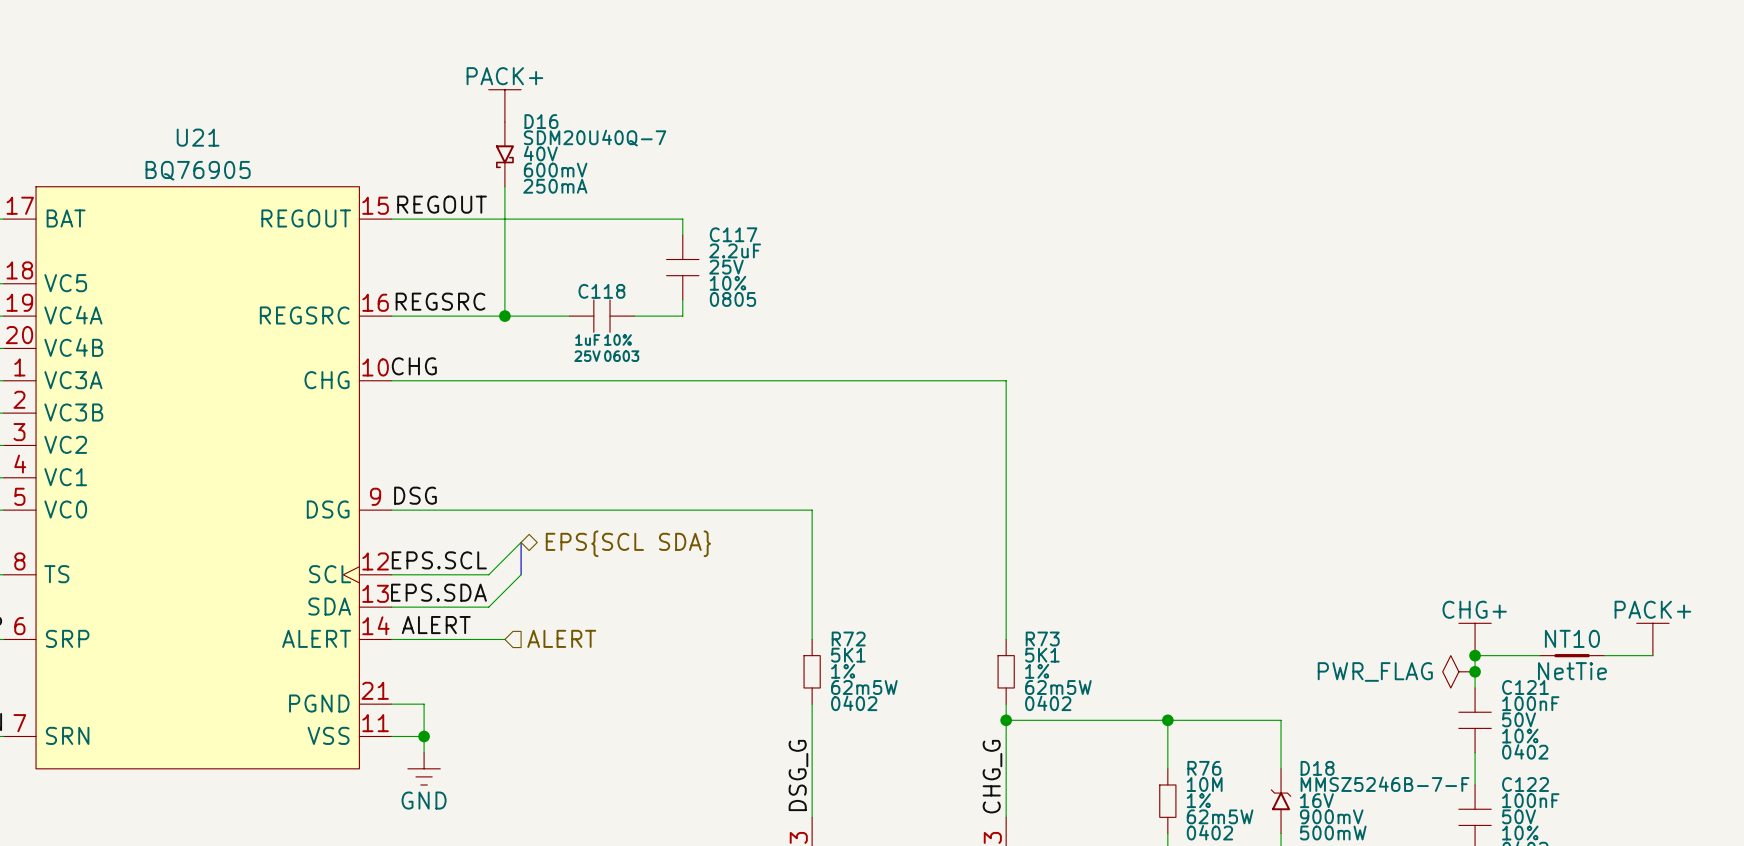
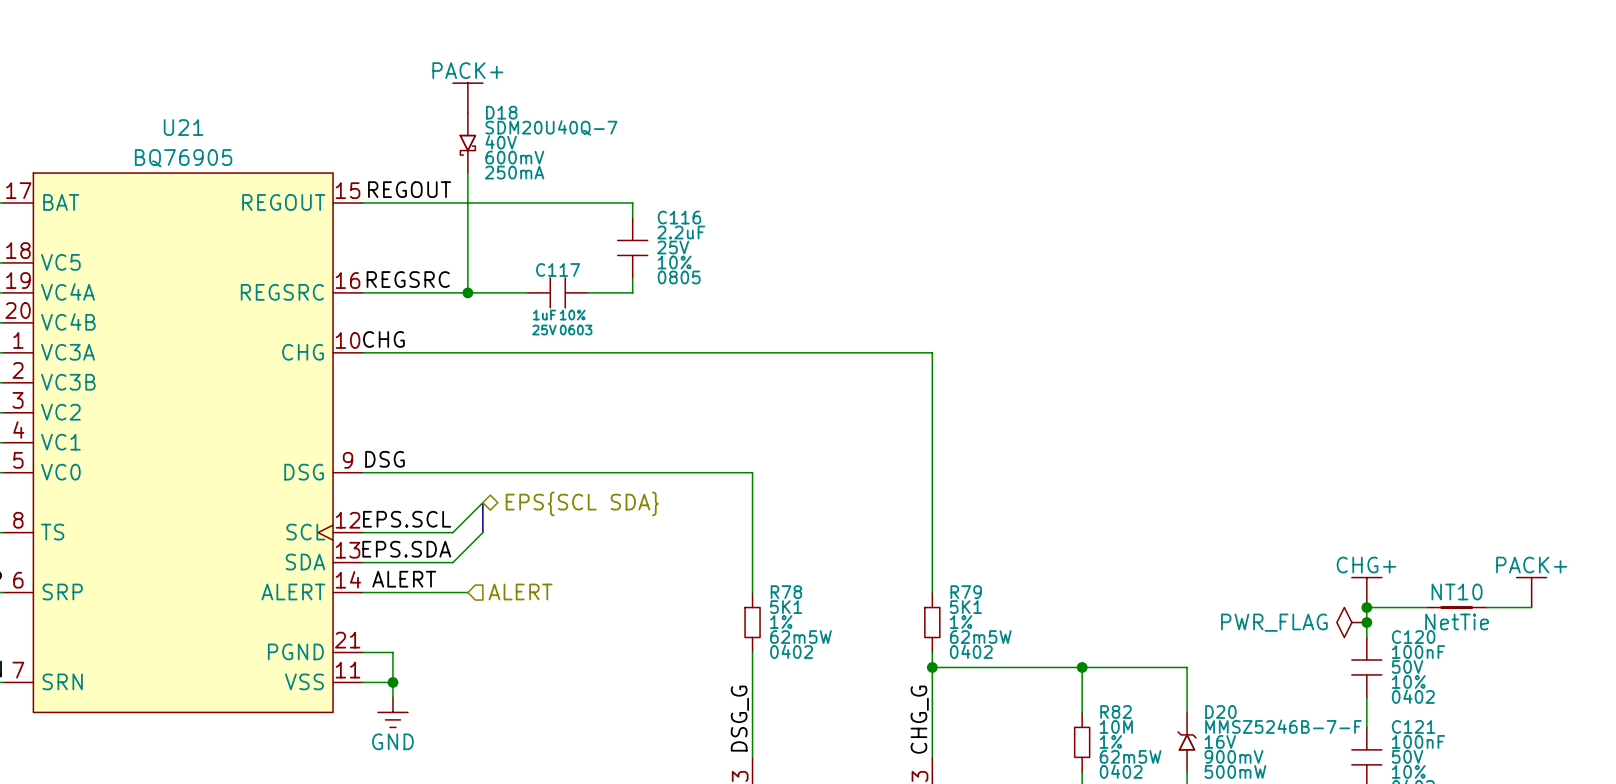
D16 name: D16 (541, 121) -> D18 (501, 112)
C117 name: C117 (733, 234) -> C116 (679, 217)
C118 name: C118 (601, 291) -> C117 (558, 269)
R72 name: R72 (848, 638) -> R78 (786, 592)
R73 name: R73 (1042, 638) -> R79 (966, 592)
C121 name: C121 (1525, 687) -> C120 (1413, 637)
R76 name: R76 (1204, 768) -> R82 (1116, 711)
D18 name: D18 (1317, 768) -> D20 (1220, 711)
C122 name: C122 (1525, 784) -> C121 (1413, 726)

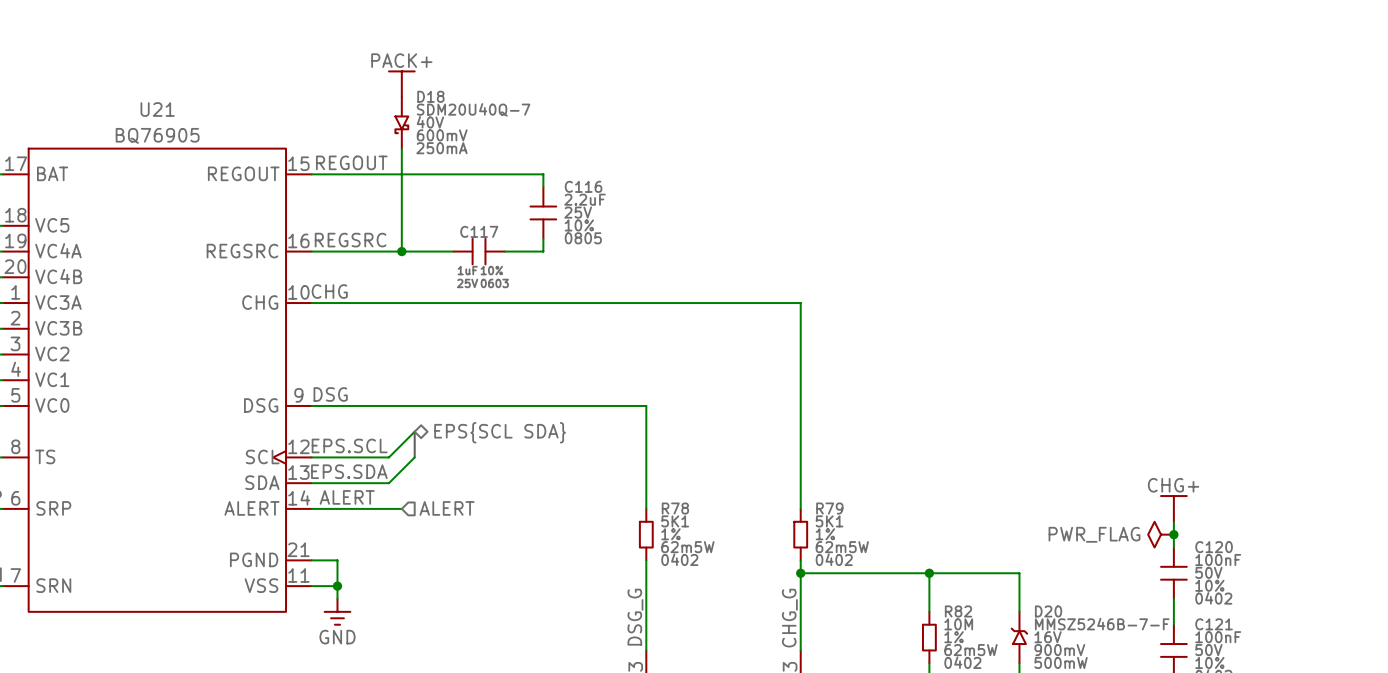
power symbol: PACK+ (1531, 592) -> none
wire: (1366, 607) (1426, 607) -> none
junction: (1366, 607) -> none
NT10: NetTie (1456, 607) -> none
wire: (1486, 607) (1531, 607) -> none

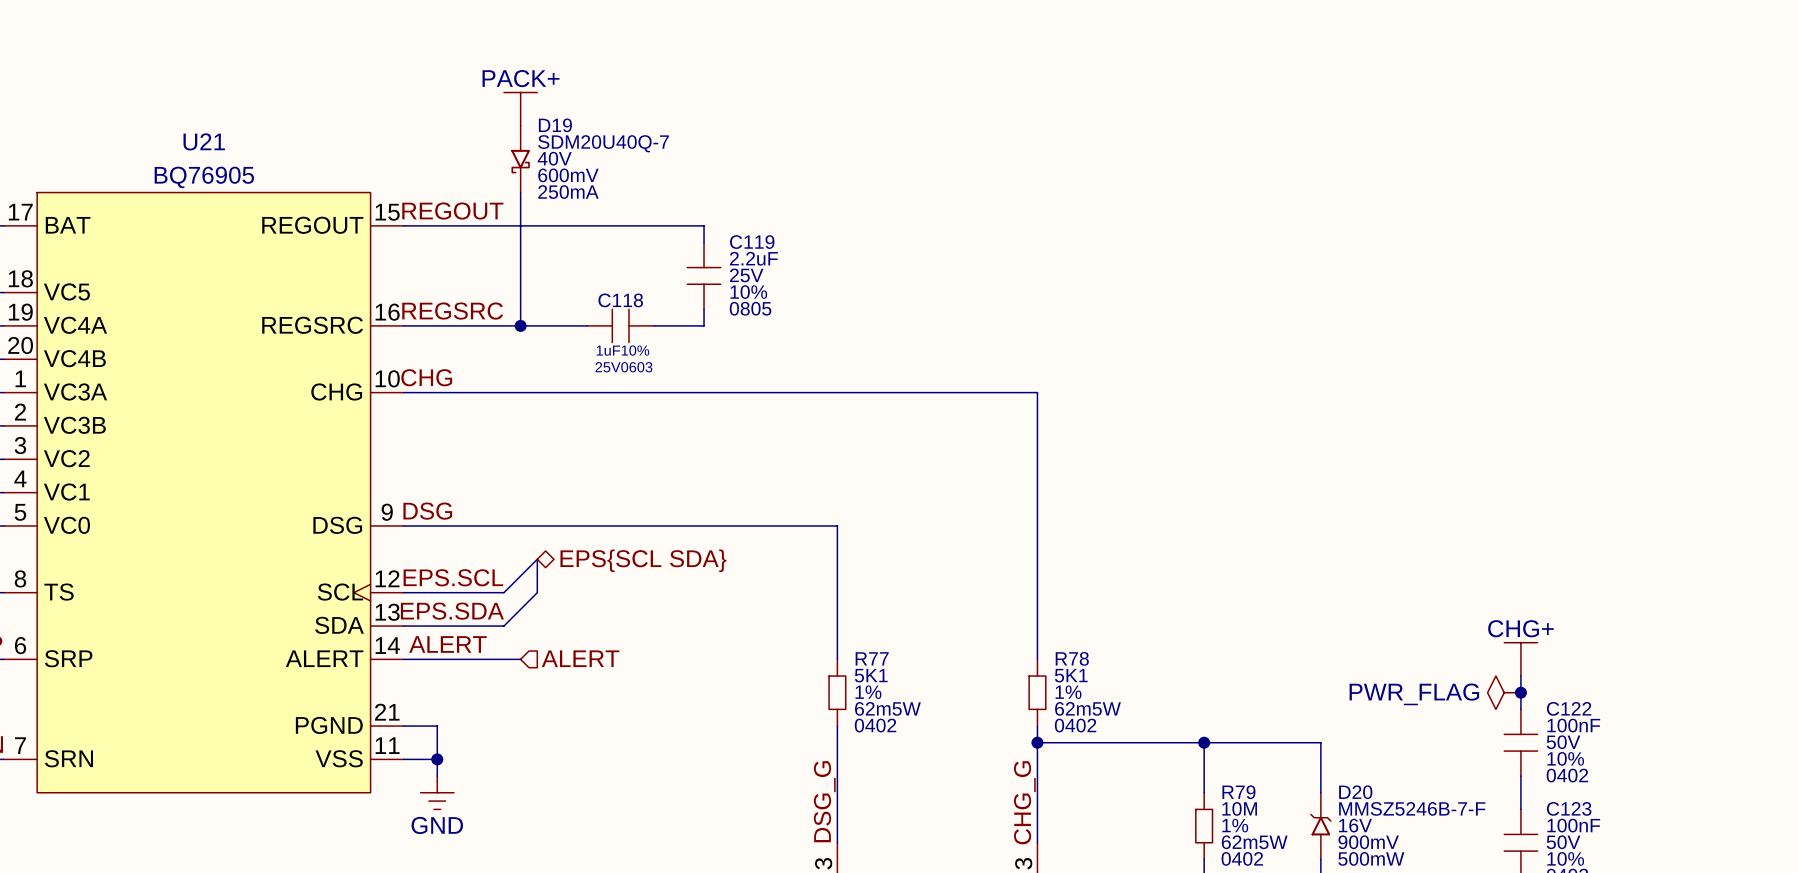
D18 name: D18 (430, 96) -> D19 (555, 125)
C116 name: C116 (583, 186) -> C119 (752, 242)
C117 name: C117 (479, 231) -> C118 (620, 300)
R78 name: R78 (675, 508) -> R77 (872, 658)
R79 name: R79 (829, 508) -> R78 (1072, 658)
C120 name: C120 (1214, 547) -> C122 (1569, 708)
R82 name: R82 (958, 611) -> R79 (1238, 792)
C121 name: C121 (1214, 624) -> C123 (1569, 808)

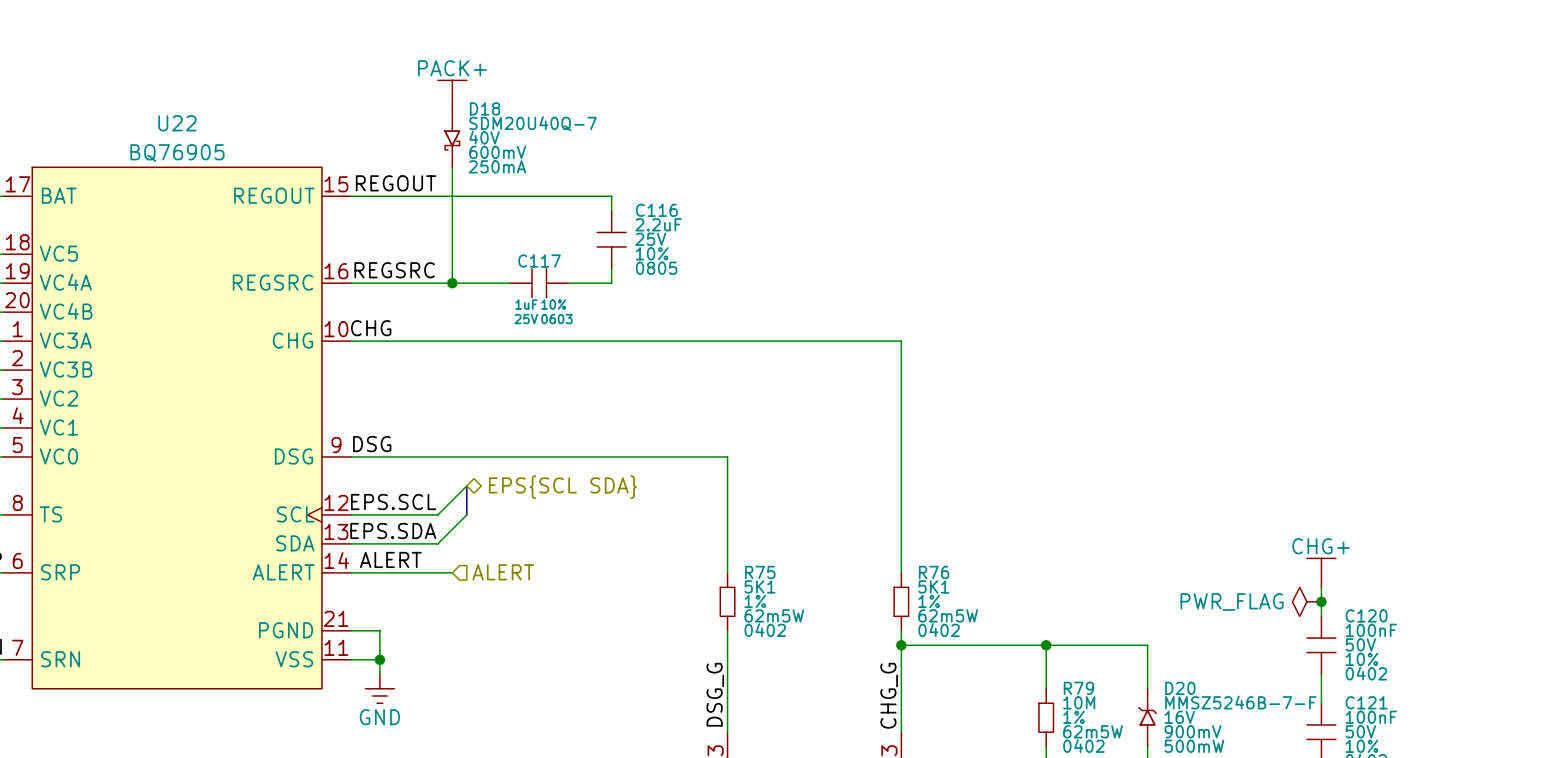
D19 name: D19 (555, 125) -> D18 (485, 108)
U21 name: U21 (204, 141) -> U22 (177, 123)
C119 name: C119 (752, 242) -> C116 (656, 210)
C118 name: C118 (620, 300) -> C117 (539, 261)
R77 name: R77 (872, 658) -> R75 (760, 572)
R78 name: R78 (1072, 658) -> R76 (934, 572)
C122 name: C122 (1569, 708) -> C120 (1366, 615)
C123 name: C123 (1569, 808) -> C121 (1366, 702)

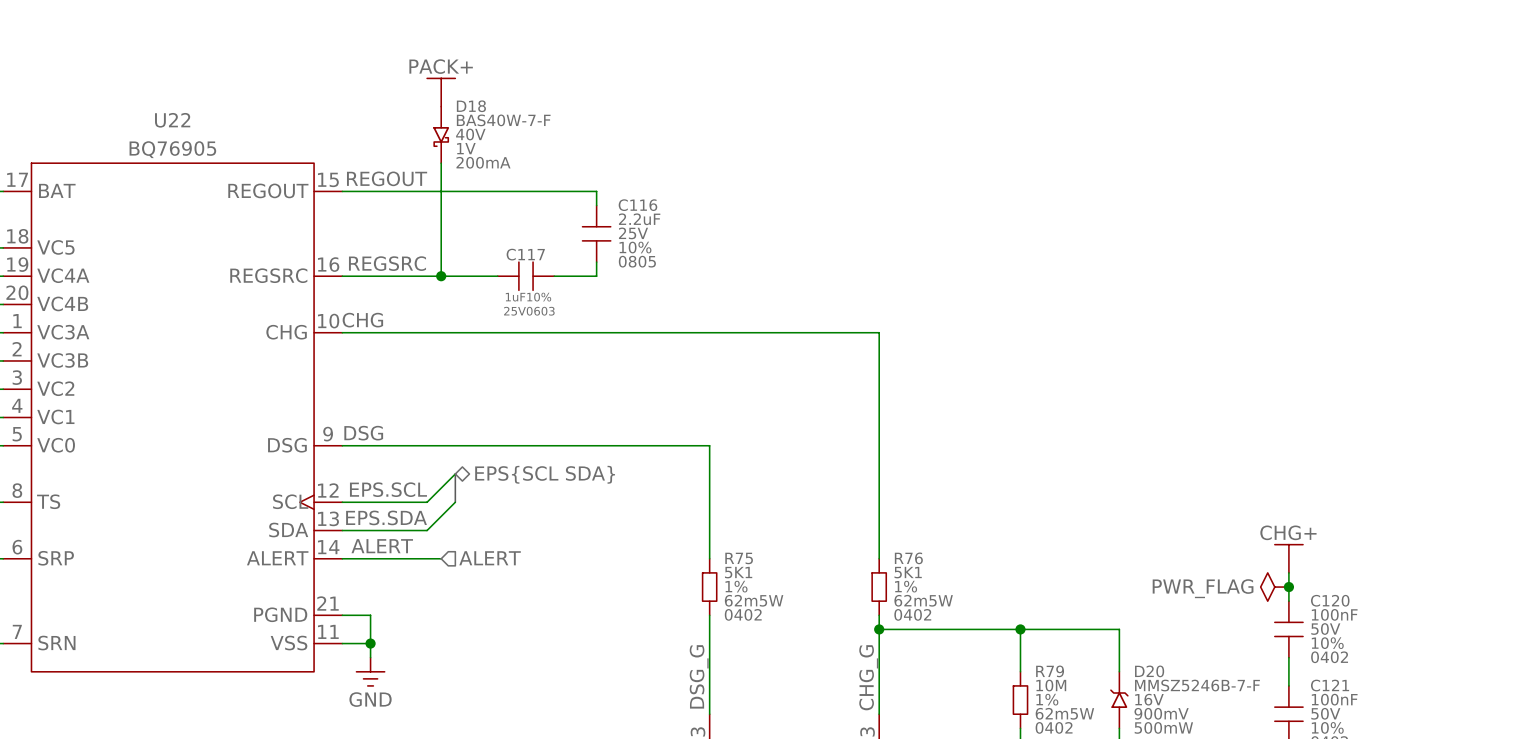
D18 value: SDM20U40Q-7 (533, 123) -> BAS40W-7-F (503, 120)
D18 text: 600mV (497, 152) -> 1V (466, 148)
D18 text: 250mA (497, 166) -> 200mA (483, 162)

